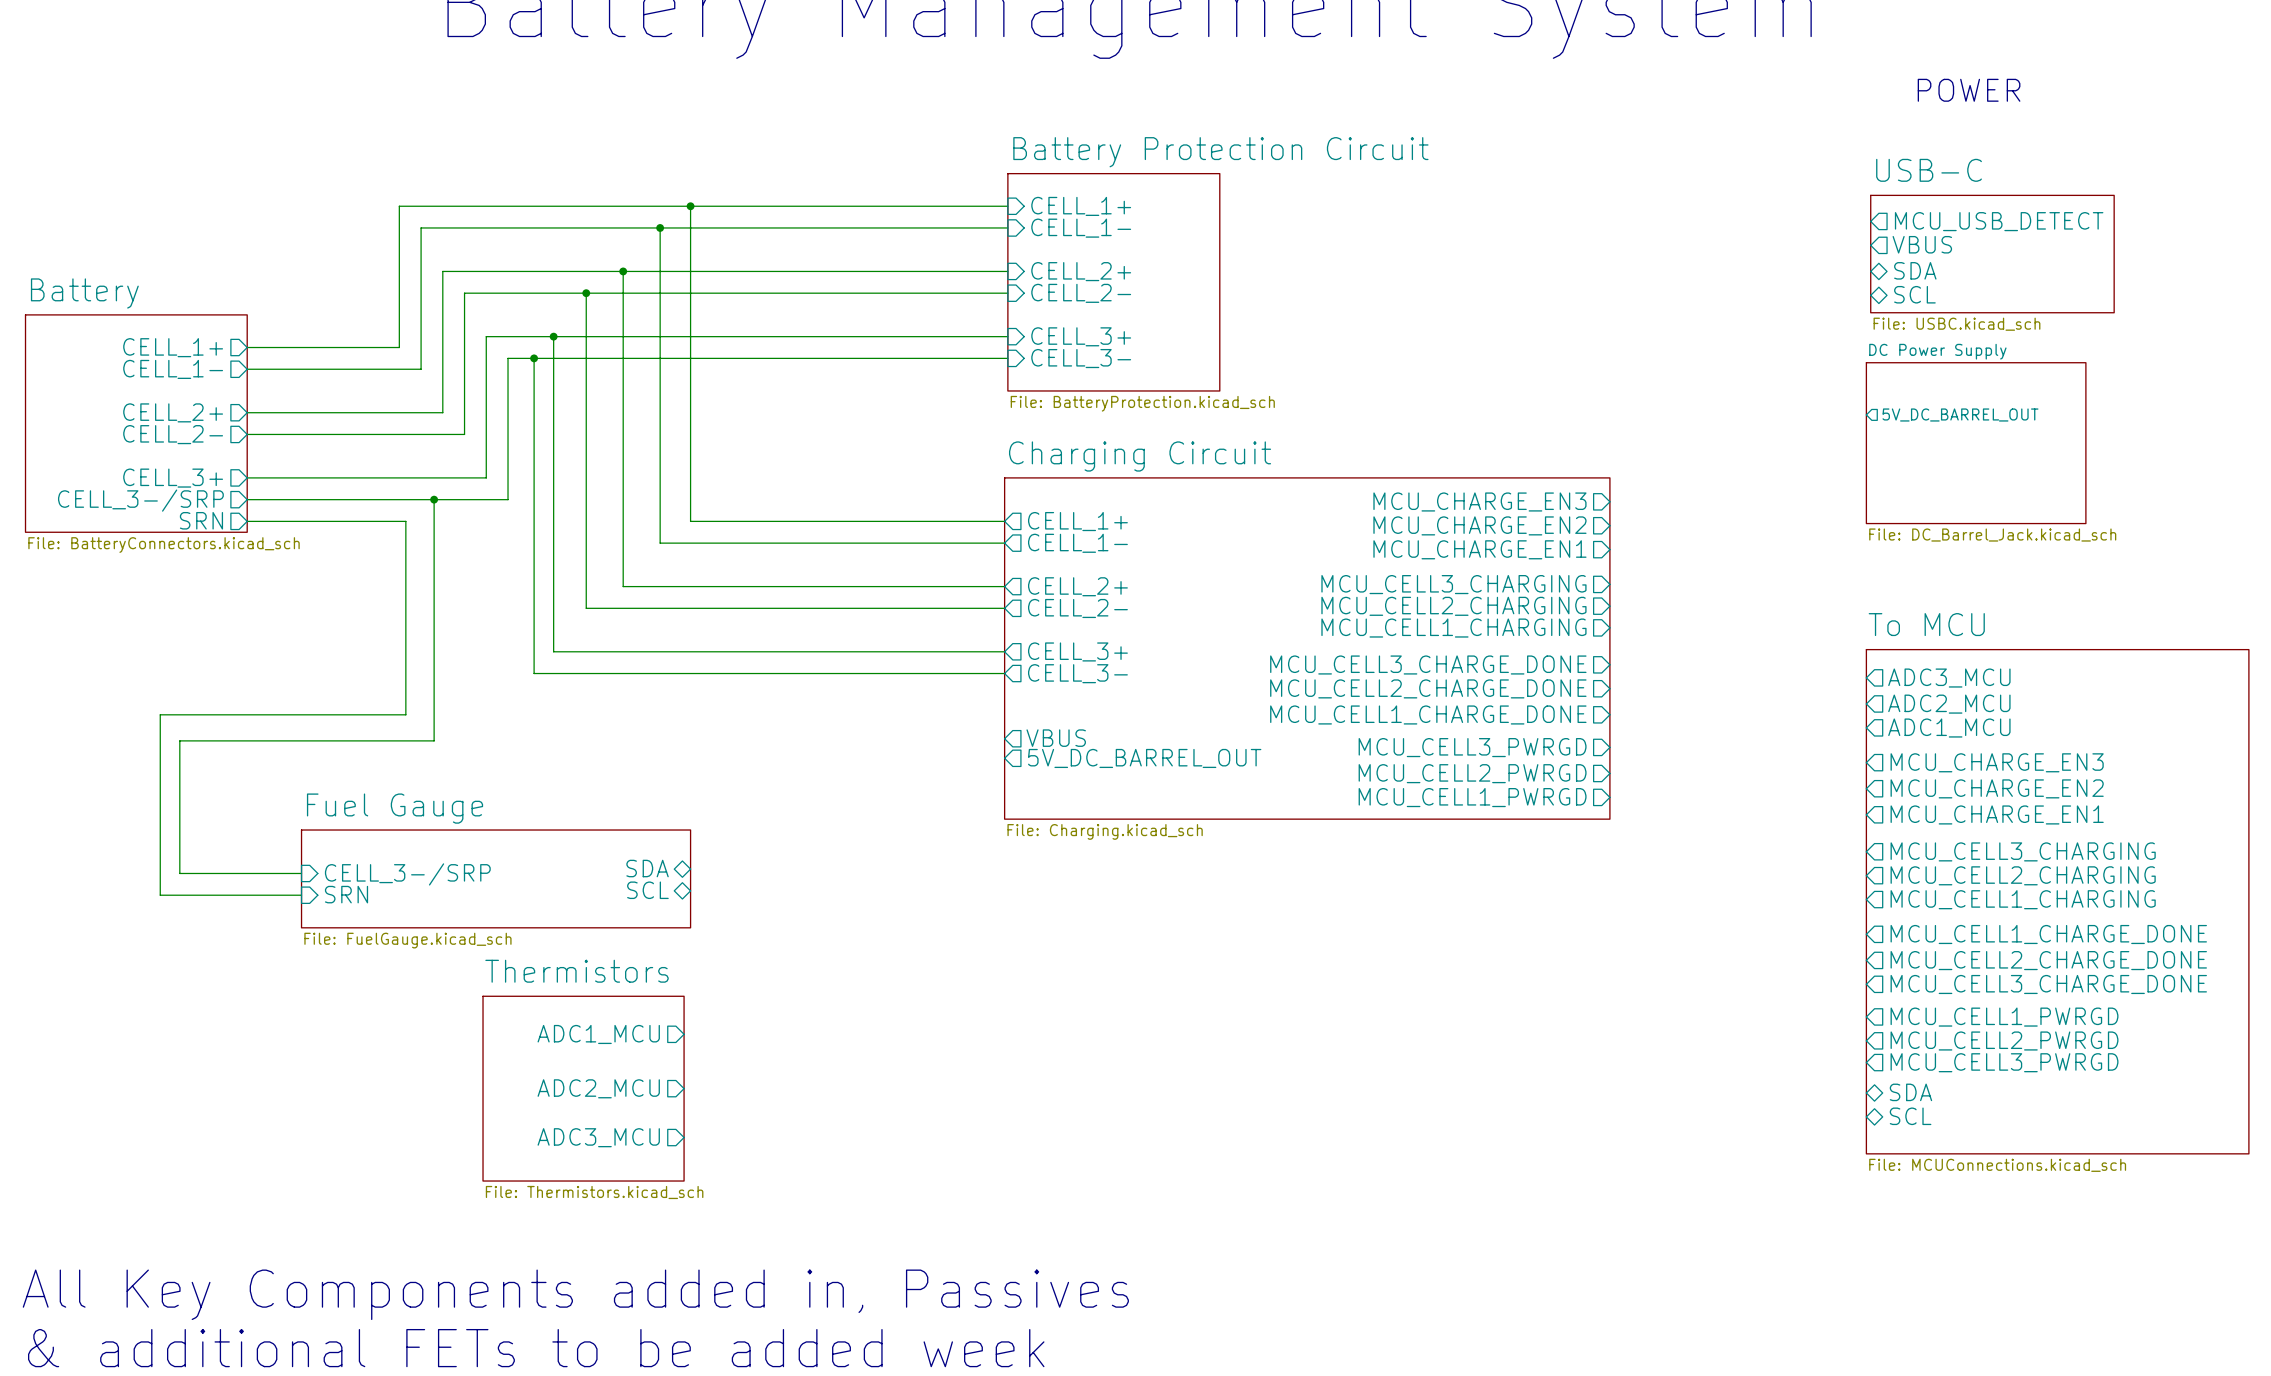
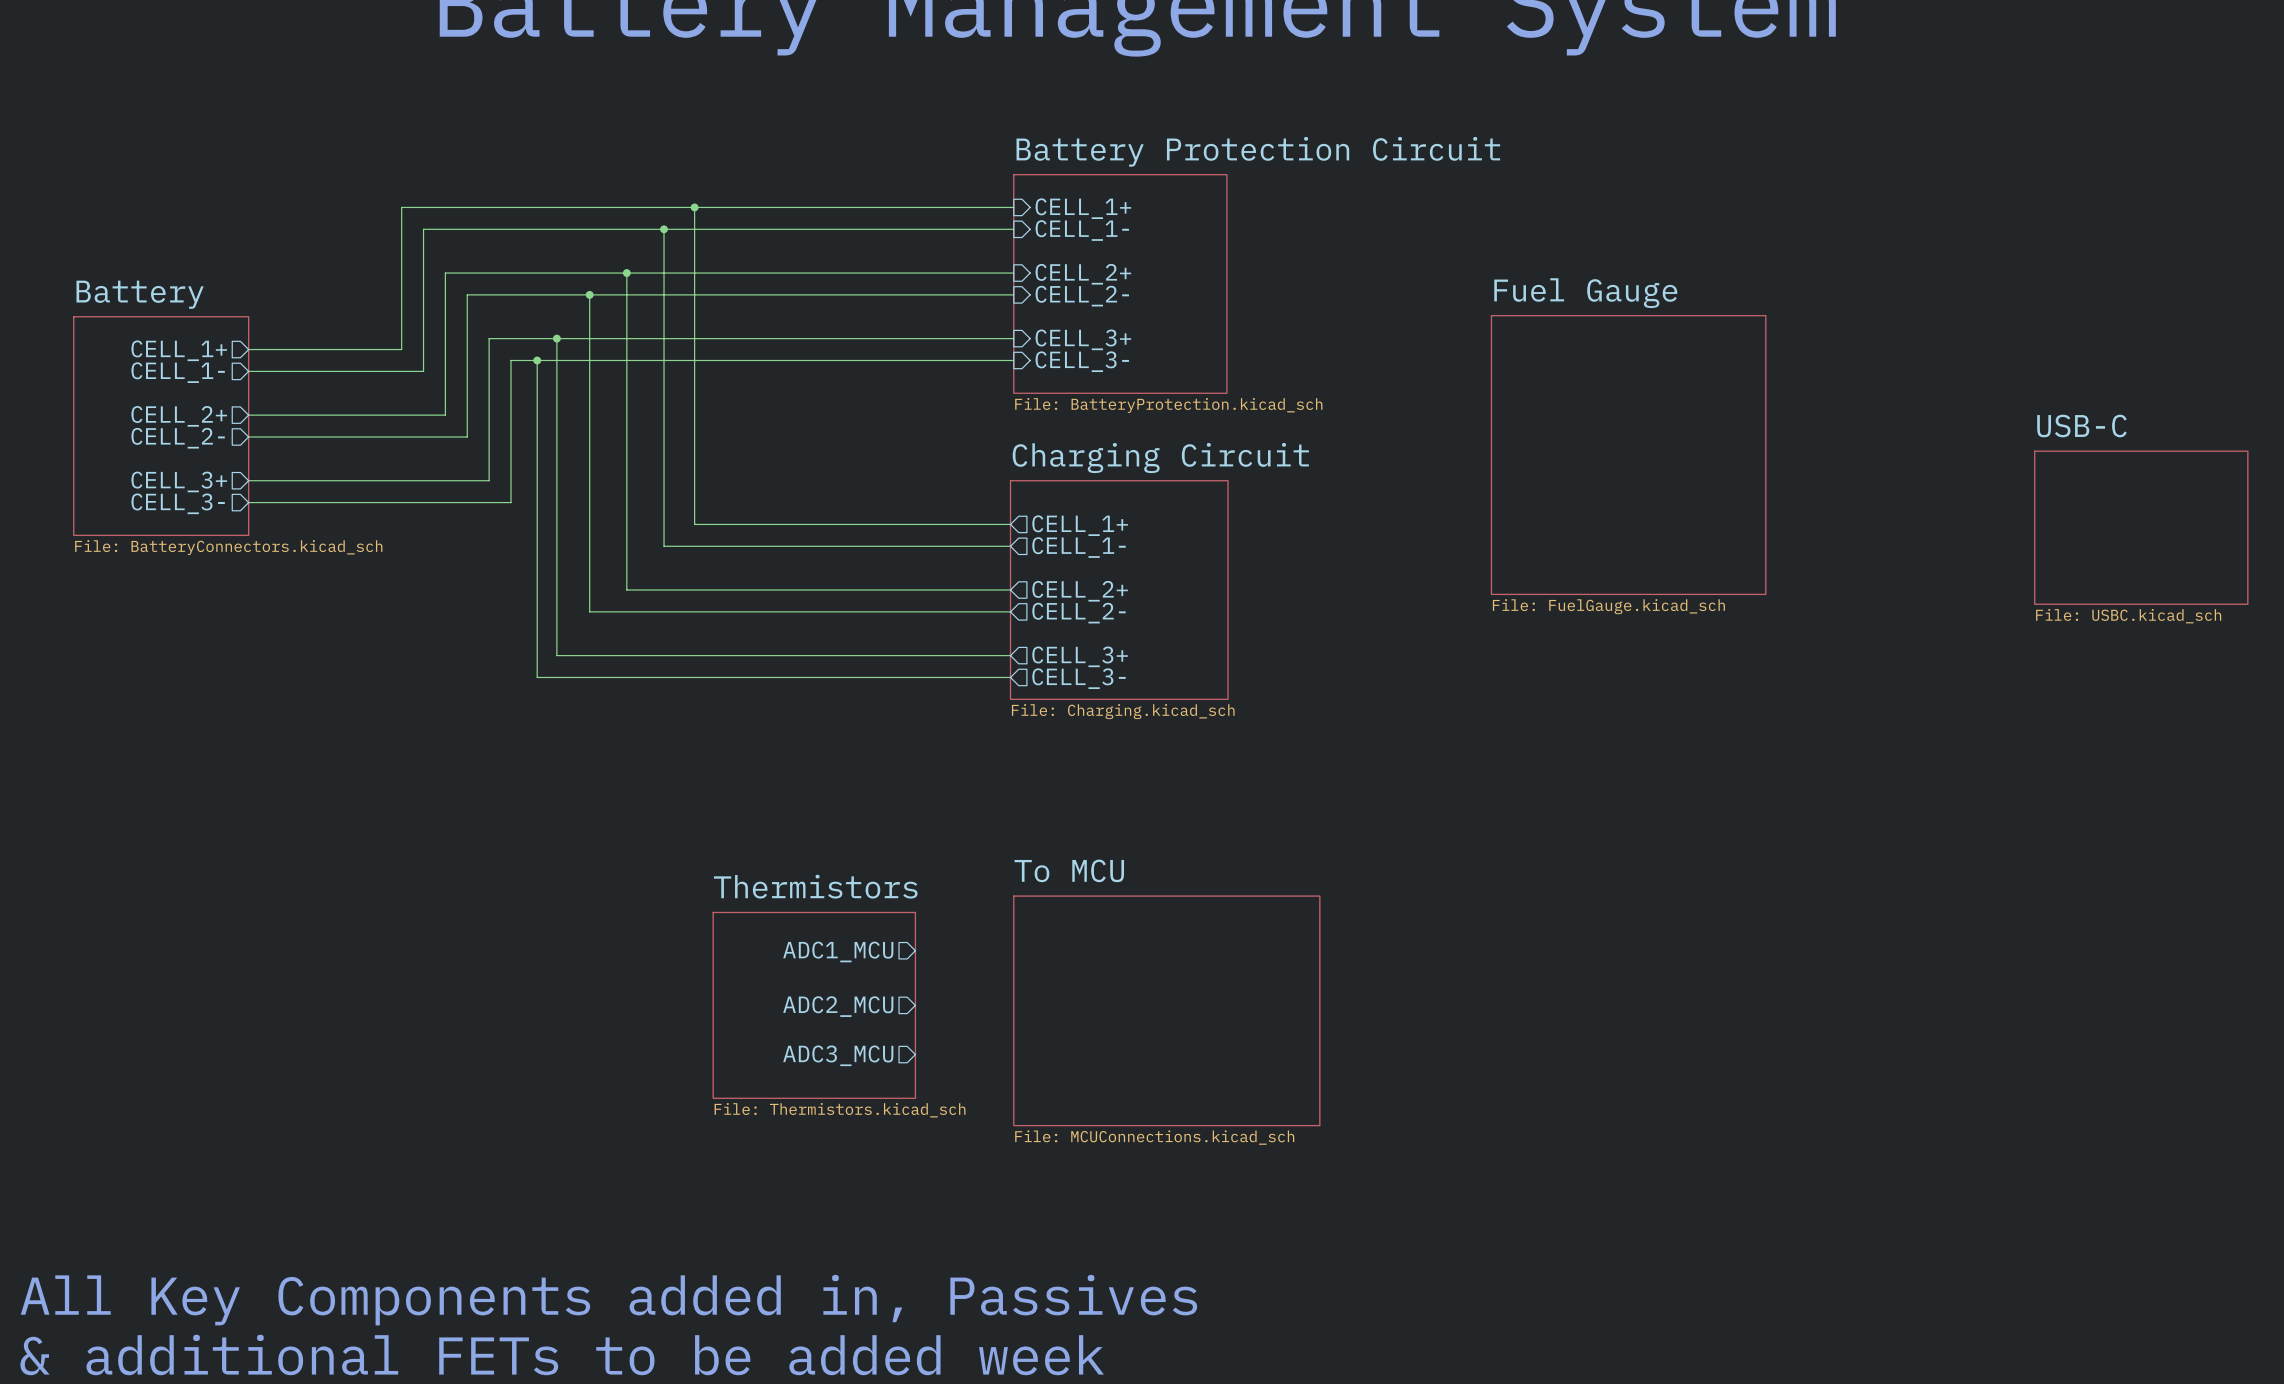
text: POWER (1969, 90) -> none
sheet pin: MCU_USB_DETECT (1999, 221) -> none
sheet pin: VBUS (1922, 244) -> none
sheet USB-C: File: USBC.kicad_sch (1992, 254) -> none
sheet pin: SDA (1915, 270) -> none
sheet pin: SCL (1914, 294) -> none
sheet pin: 5V_DC_BARREL_OUT (1960, 415) -> none
sheet Battery: File: BatteryConnectors.kicad_sch (136, 423) -> none
sheet Battery: none -> File: BatteryConnectors.kicad_sch (161, 426)
sheet DC Power Supply: File: DC_Barrel_Jack.kicad_sch (1976, 443) -> none
sheet Fuel Gauge: none -> File: FuelGauge.kicad_sch (1628, 455)
wire: (434, 499) (434, 740) (179, 740) (179, 873) (301, 873) -> none
junction: (434, 499) -> none
sheet pin: CELL_3-/SRP (140, 500) -> CELL_3- (178, 503)
sheet pin: MCU_CHARGE_EN3 (1479, 501) -> none
sheet pin: SRN (201, 520) -> none
wire: (247, 521) (405, 521) (405, 714) (160, 714) (160, 895) (301, 895) -> none
sheet USB-C: none -> File: USBC.kicad_sch (2141, 527)
sheet pin: MCU_CHARGE_EN2 (1479, 525) -> none
sheet pin: MCU_CHARGE_EN1 (1479, 549) -> none
sheet pin: MCU_CELL3_CHARGING (1453, 584) -> none
sheet Charging Circuit: none -> File: Charging.kicad_sch (1119, 590)
sheet pin: MCU_CELL2_CHARGING (1453, 606) -> none
sheet pin: MCU_CELL1_CHARGING (1453, 628) -> none
sheet Charging Circuit: File: Charging.kicad_sch (1307, 648) -> none
sheet pin: MCU_CELL3_CHARGE_DONE (1428, 665) -> none
sheet pin: ADC3_MCU (1949, 678) -> none
sheet pin: MCU_CELL2_CHARGE_DONE (1428, 688) -> none
sheet pin: ADC2_MCU (1949, 704) -> none
sheet pin: MCU_CELL1_CHARGE_DONE (1428, 714) -> none
sheet pin: ADC1_MCU (1949, 728) -> none
sheet pin: VBUS (1056, 738) -> none
sheet pin: MCU_CELL3_PWRGD (1472, 747) -> none
sheet pin: 5V_DC_BARREL_OUT (1144, 758) -> none
sheet pin: MCU_CHARGE_EN3 (1997, 762) -> none
sheet pin: MCU_CELL2_PWRGD (1472, 773) -> none
sheet pin: MCU_CHARGE_EN2 (1997, 788) -> none
sheet pin: MCU_CELL1_PWRGD (1472, 797) -> none
sheet pin: MCU_CHARGE_EN1 (1997, 814) -> none
sheet pin: MCU_CELL3_CHARGING (2023, 851) -> none
sheet pin: SDA (647, 868) -> none
sheet pin: CELL_3-/SRP (407, 874) -> none
sheet pin: MCU_CELL2_CHARGING (2023, 875) -> none
sheet Fuel Gauge: File: FuelGauge.kicad_sch (496, 878) -> none
sheet pin: SCL (647, 890) -> none
sheet pin: SRN (346, 894) -> none
sheet pin: MCU_CELL1_CHARGING (2023, 899) -> none
sheet To MCU: File: MCUConnections.kicad_sch (2057, 901) -> none
sheet pin: MCU_CELL1_CHARGE_DONE (2048, 934) -> none
sheet pin: none -> ADC1_MCU (838, 951)
sheet pin: MCU_CELL2_CHARGE_DONE (2048, 960) -> none
sheet pin: MCU_CELL3_CHARGE_DONE (2048, 984) -> none
sheet Thermistors: none -> File: Thermistors.kicad_sch (814, 1005)
sheet pin: none -> ADC2_MCU (838, 1006)
sheet To MCU: none -> File: MCUConnections.kicad_sch (1166, 1010)
sheet pin: MCU_CELL1_PWRGD (2004, 1017) -> none
sheet pin: ADC1_MCU (598, 1034) -> none
sheet pin: MCU_CELL2_PWRGD (2004, 1041) -> none
sheet pin: none -> ADC3_MCU (838, 1055)
sheet pin: MCU_CELL3_PWRGD (2004, 1062) -> none
sheet Thermistors: File: Thermistors.kicad_sch (583, 1088) -> none
sheet pin: ADC2_MCU (598, 1088) -> none
sheet pin: SDA (1910, 1092) -> none
sheet pin: SCL (1910, 1116) -> none
sheet pin: ADC3_MCU (598, 1137) -> none

